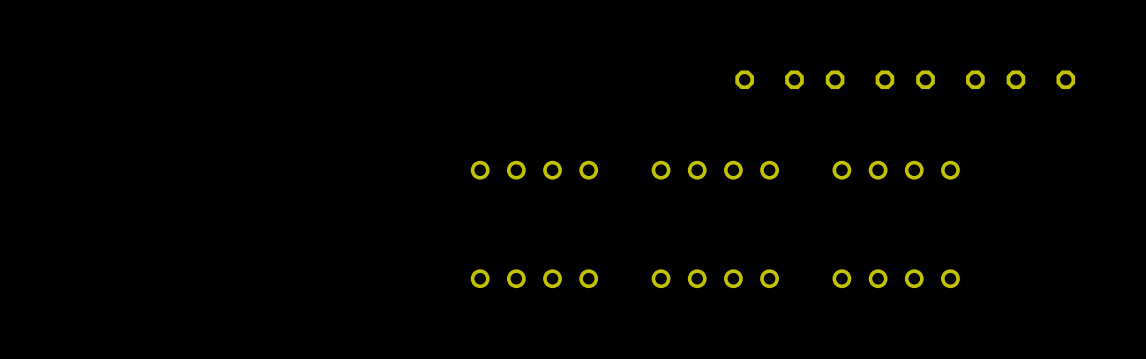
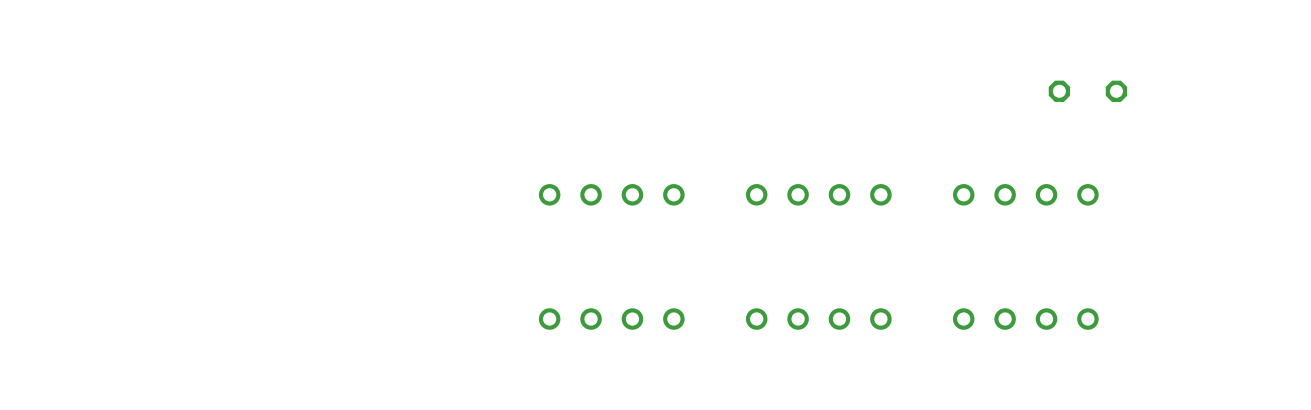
part: (769, 79) -> none
part: (860, 79) -> none
part: (1040, 79) -> none

